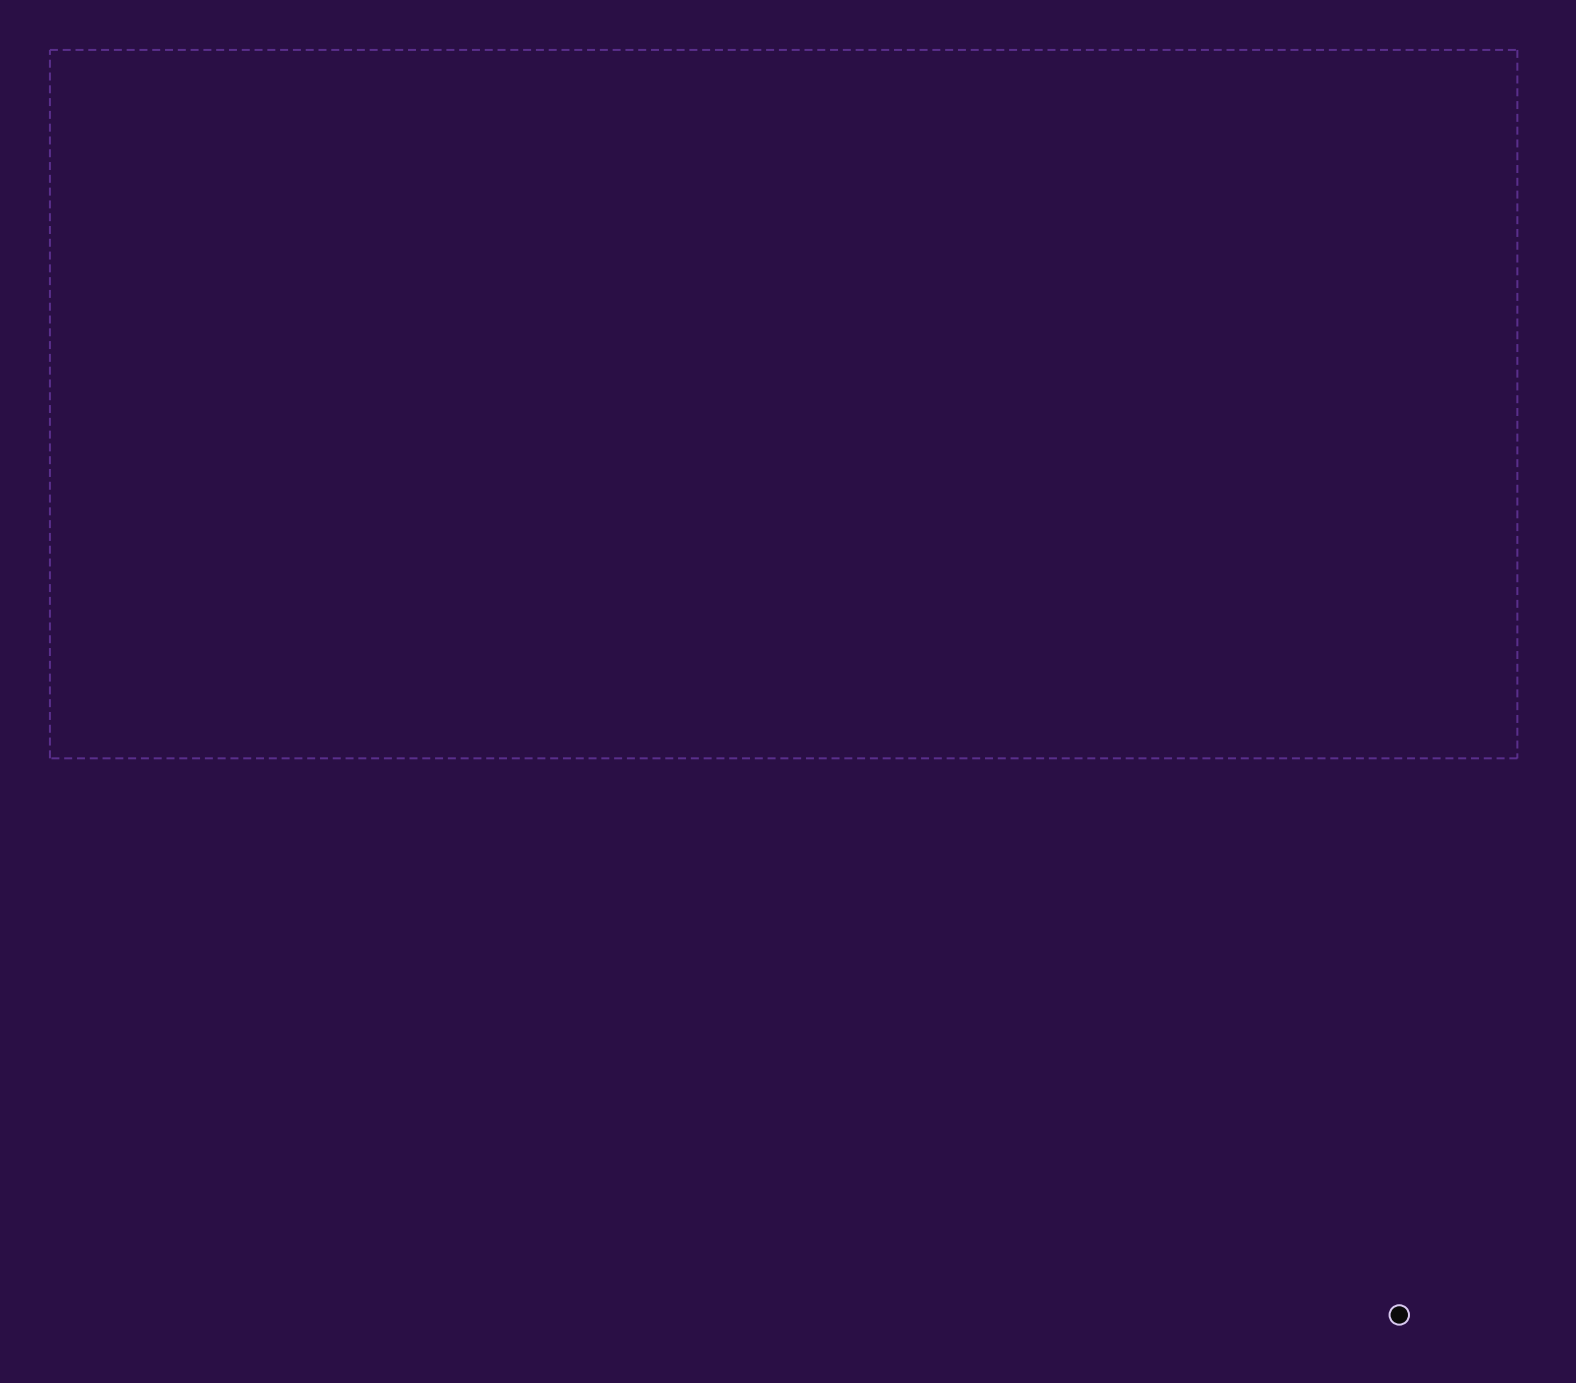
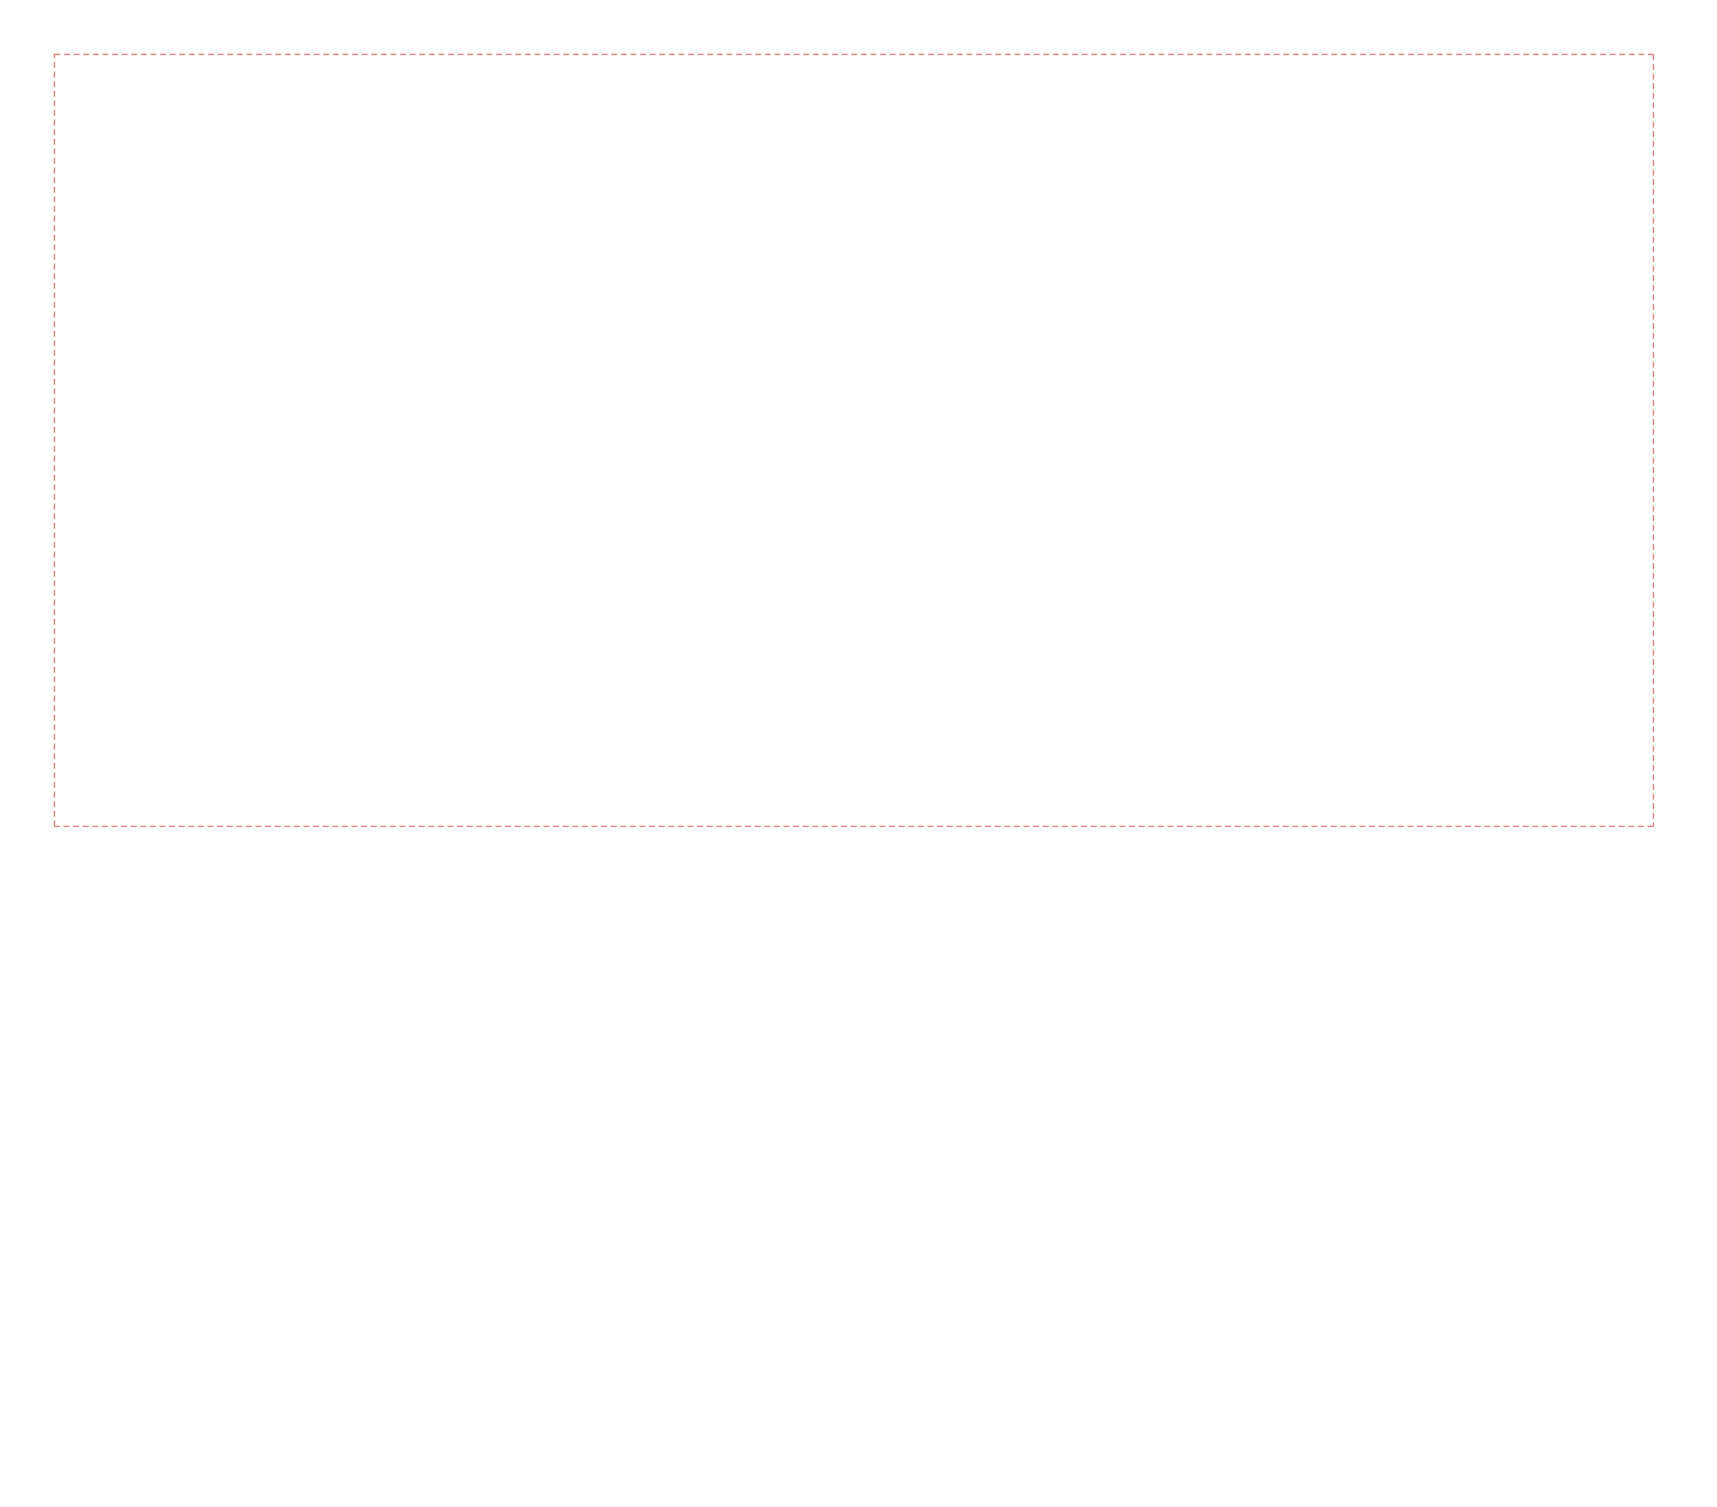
part: (1399, 1314) -> none

